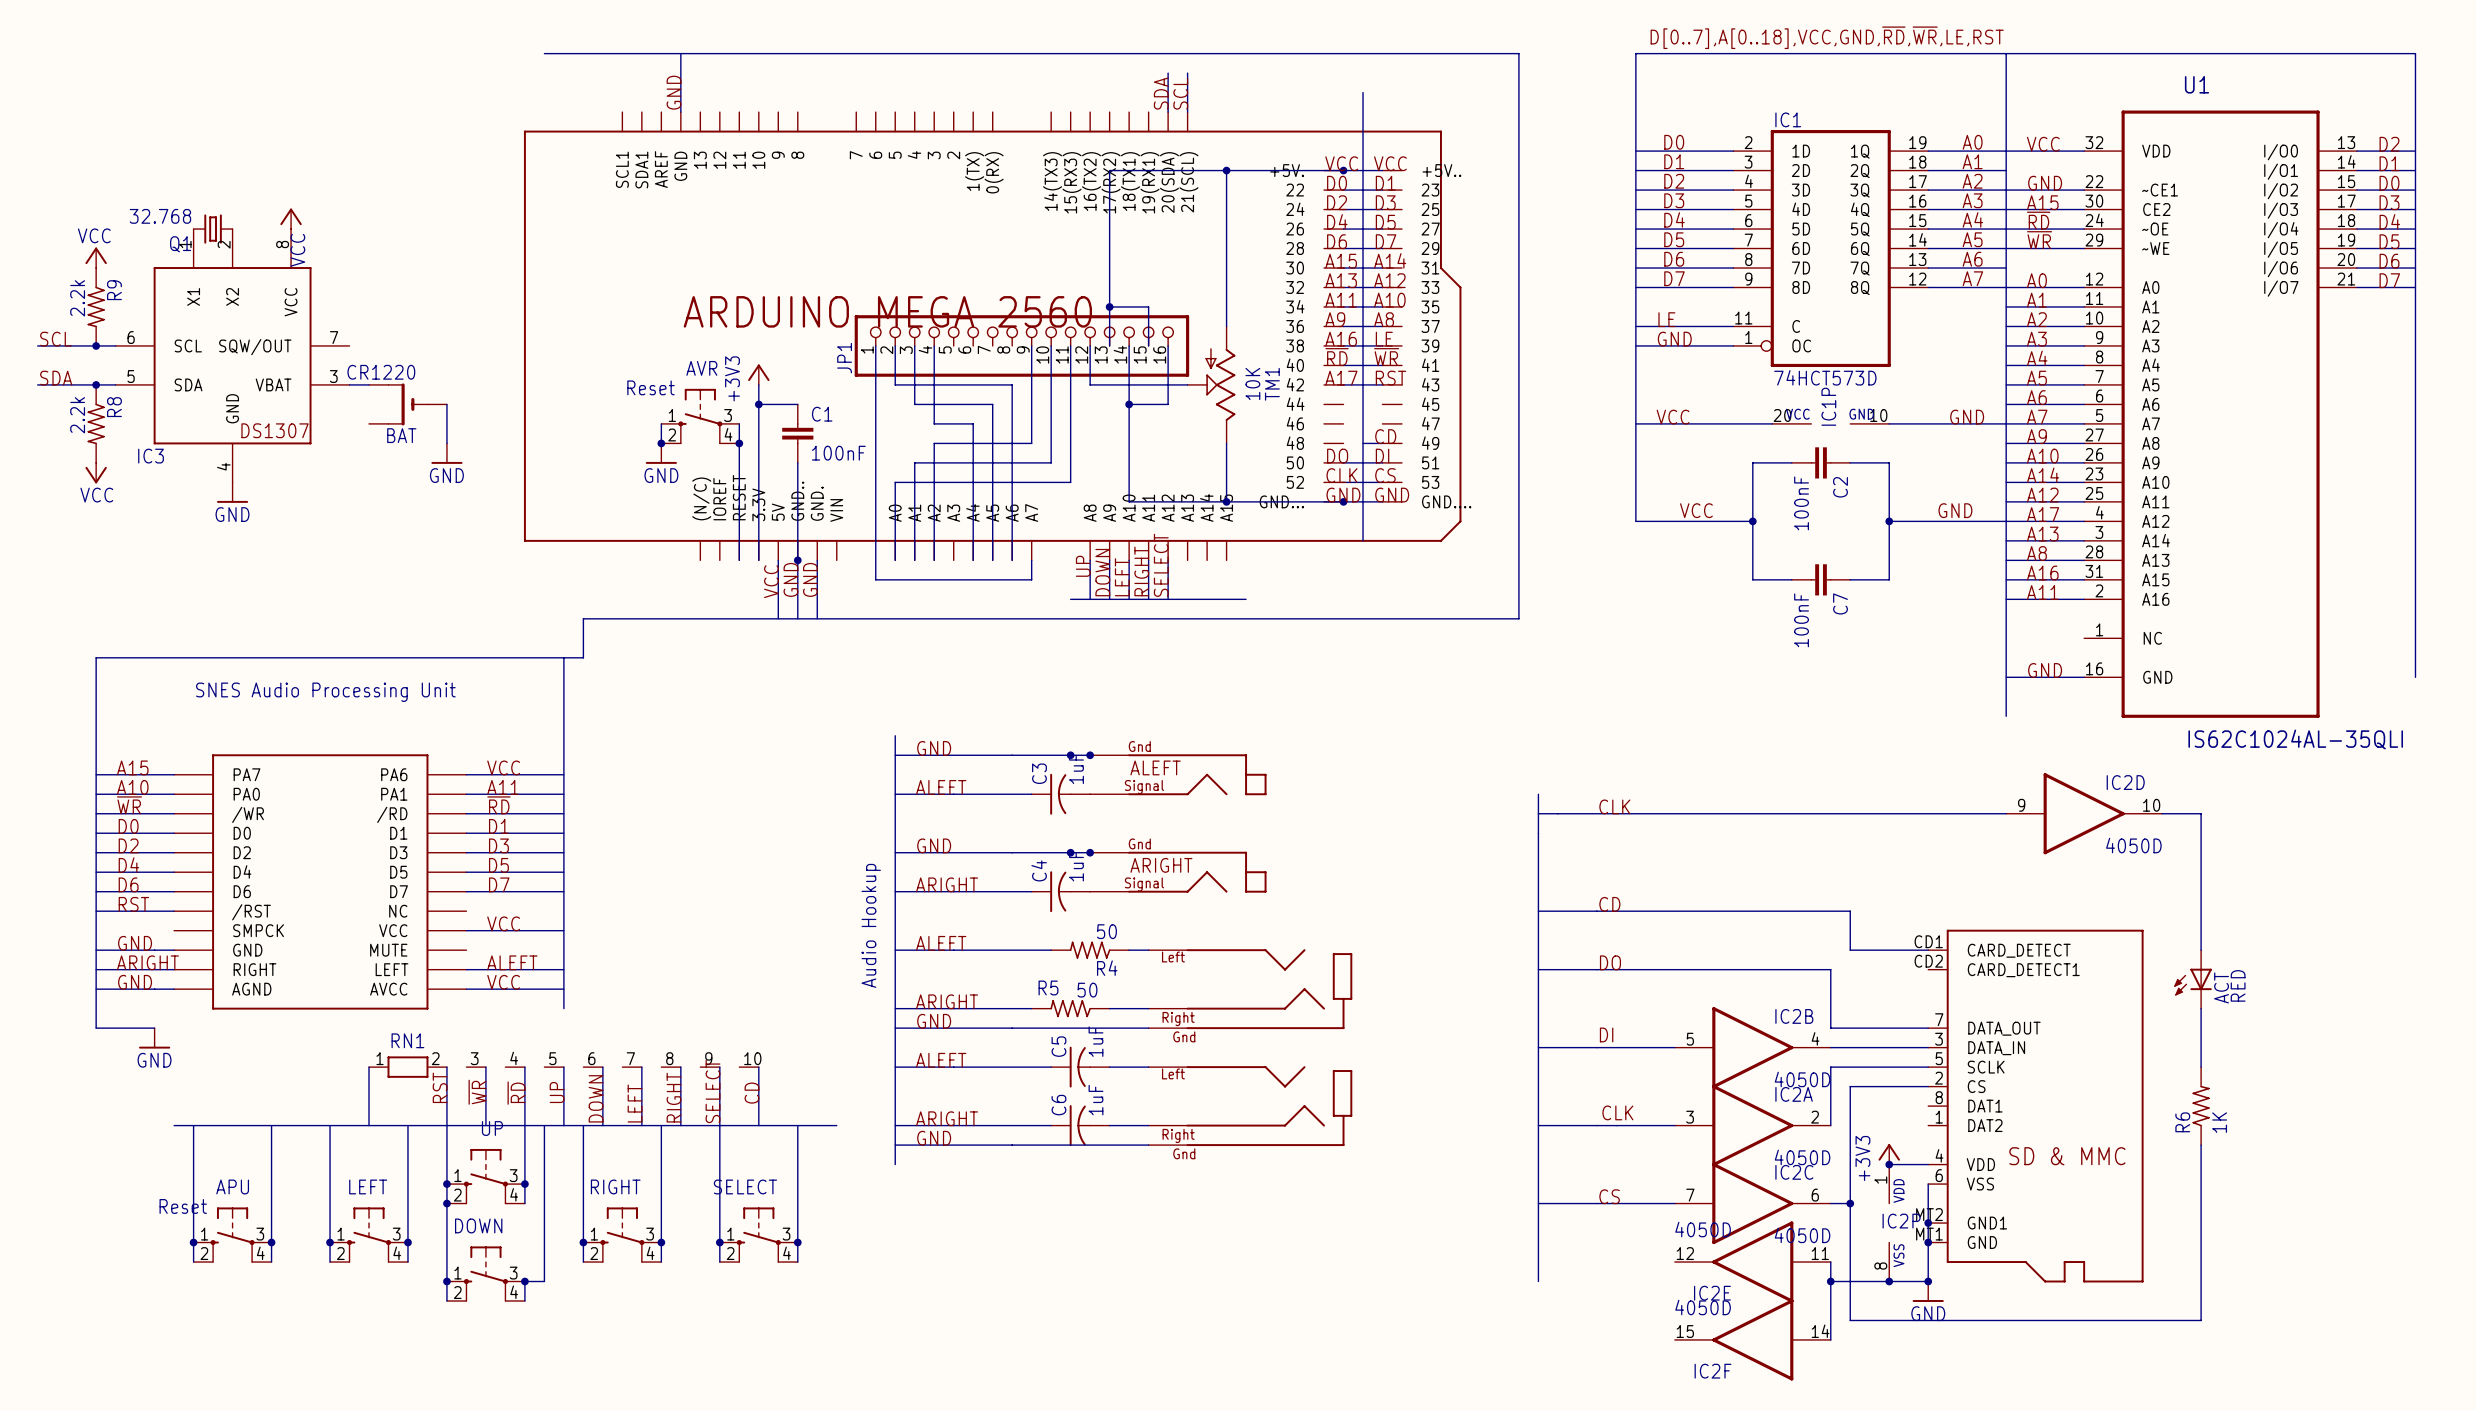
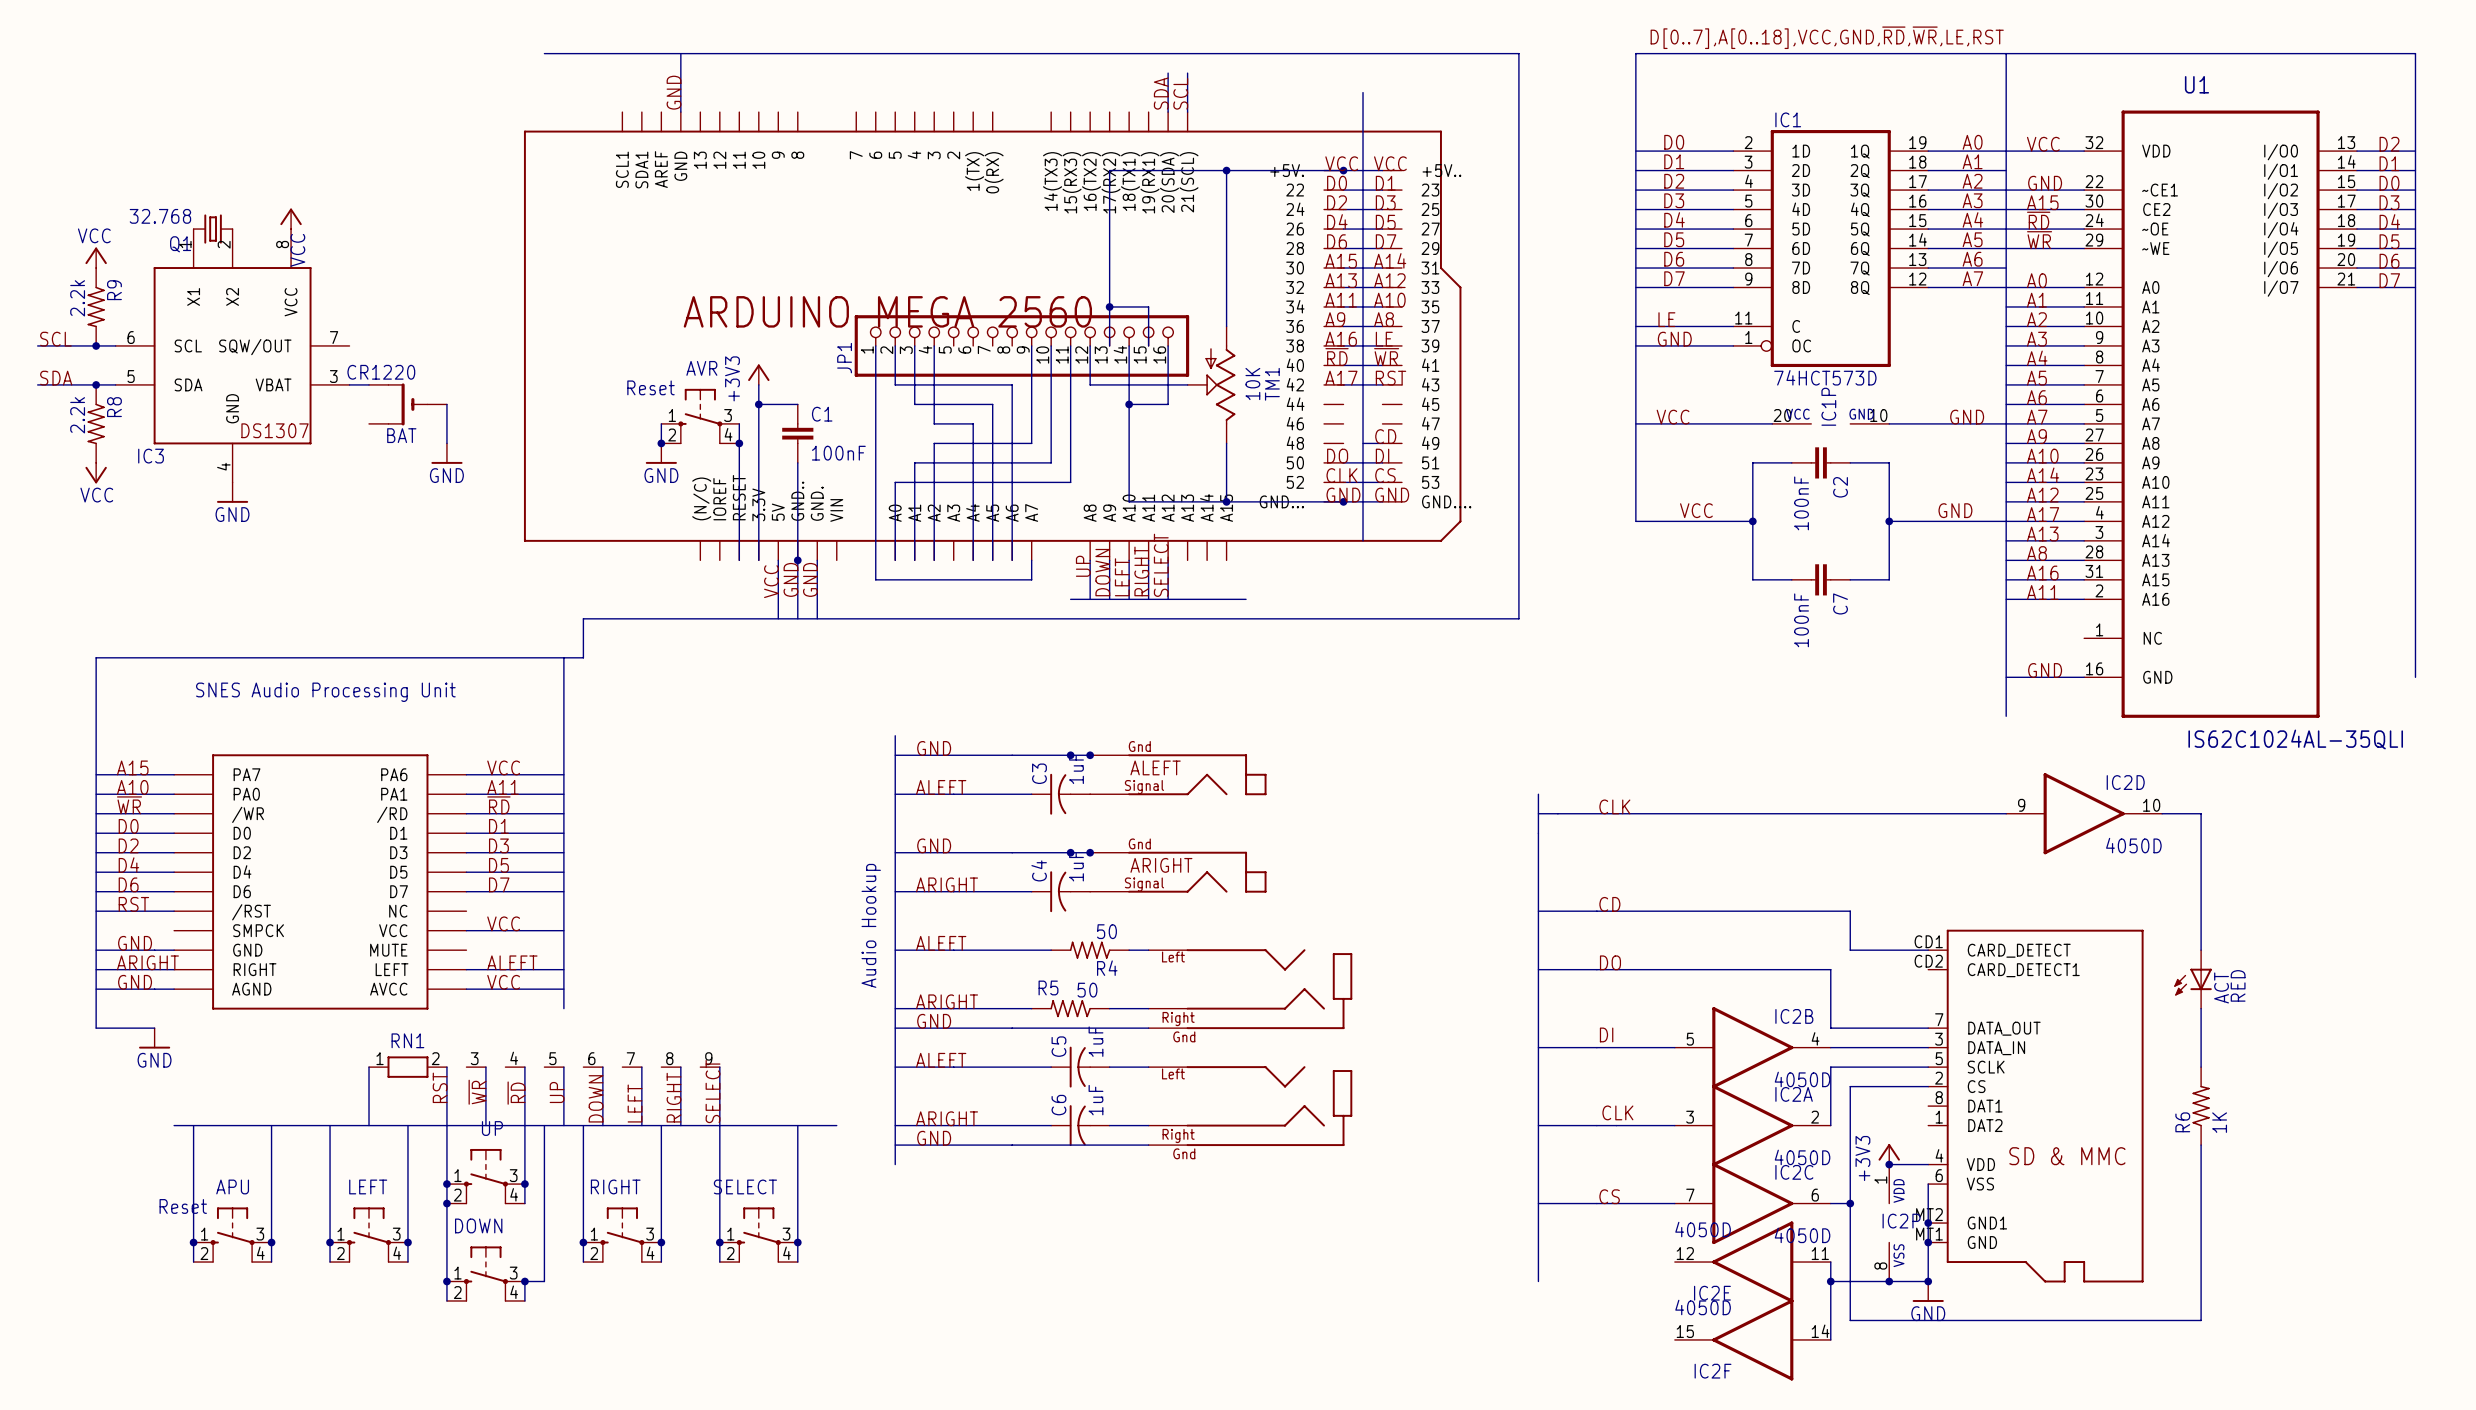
RN1 symbol: [369, 1056, 759, 1078] -> [369, 1056, 720, 1078]
wire: (758, 1067) (758, 1125) -> none
label: CD (751, 1093) -> none

